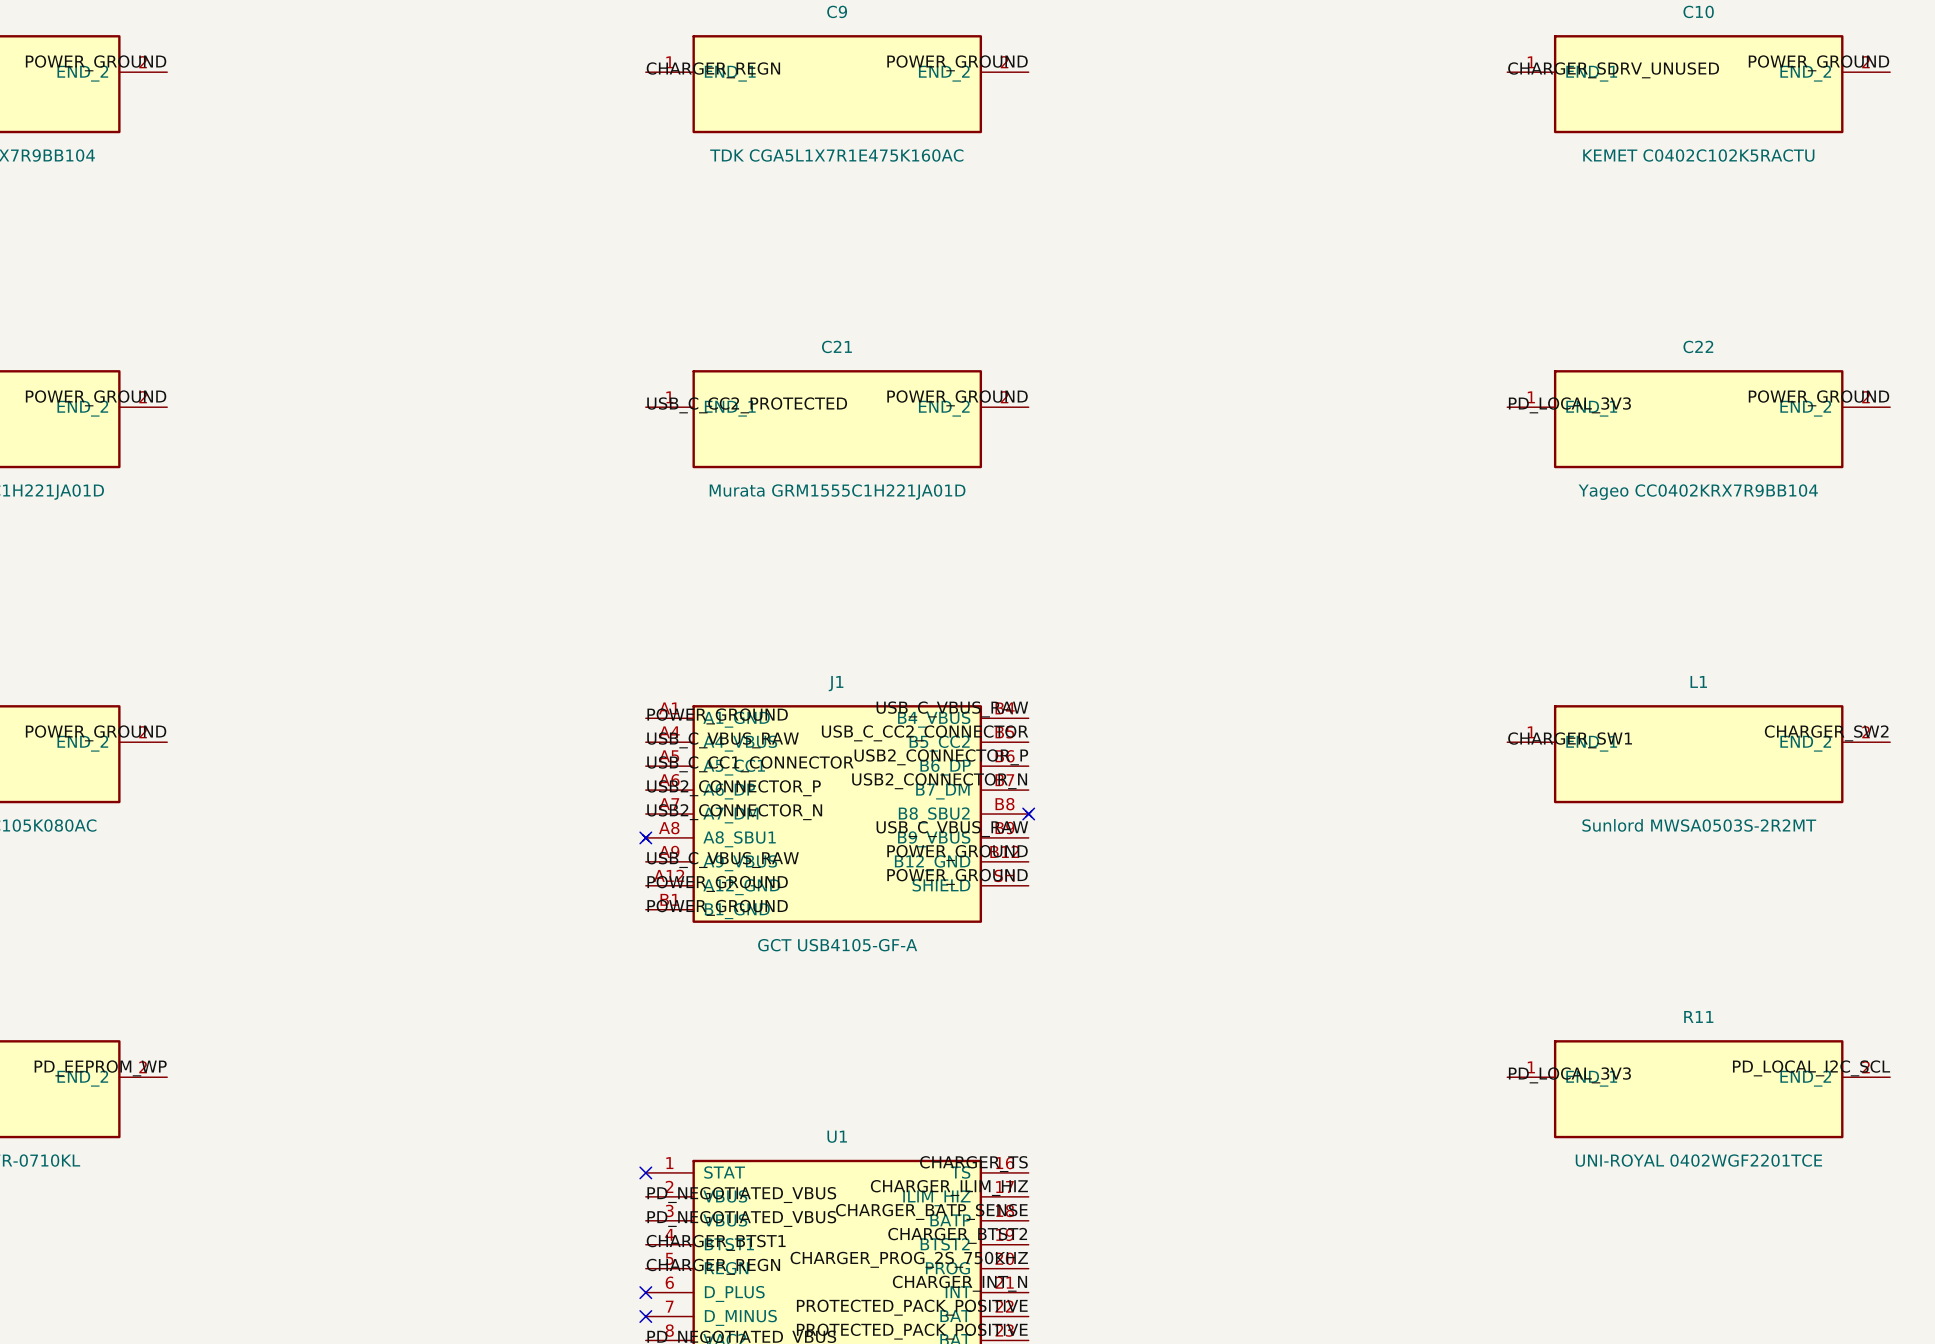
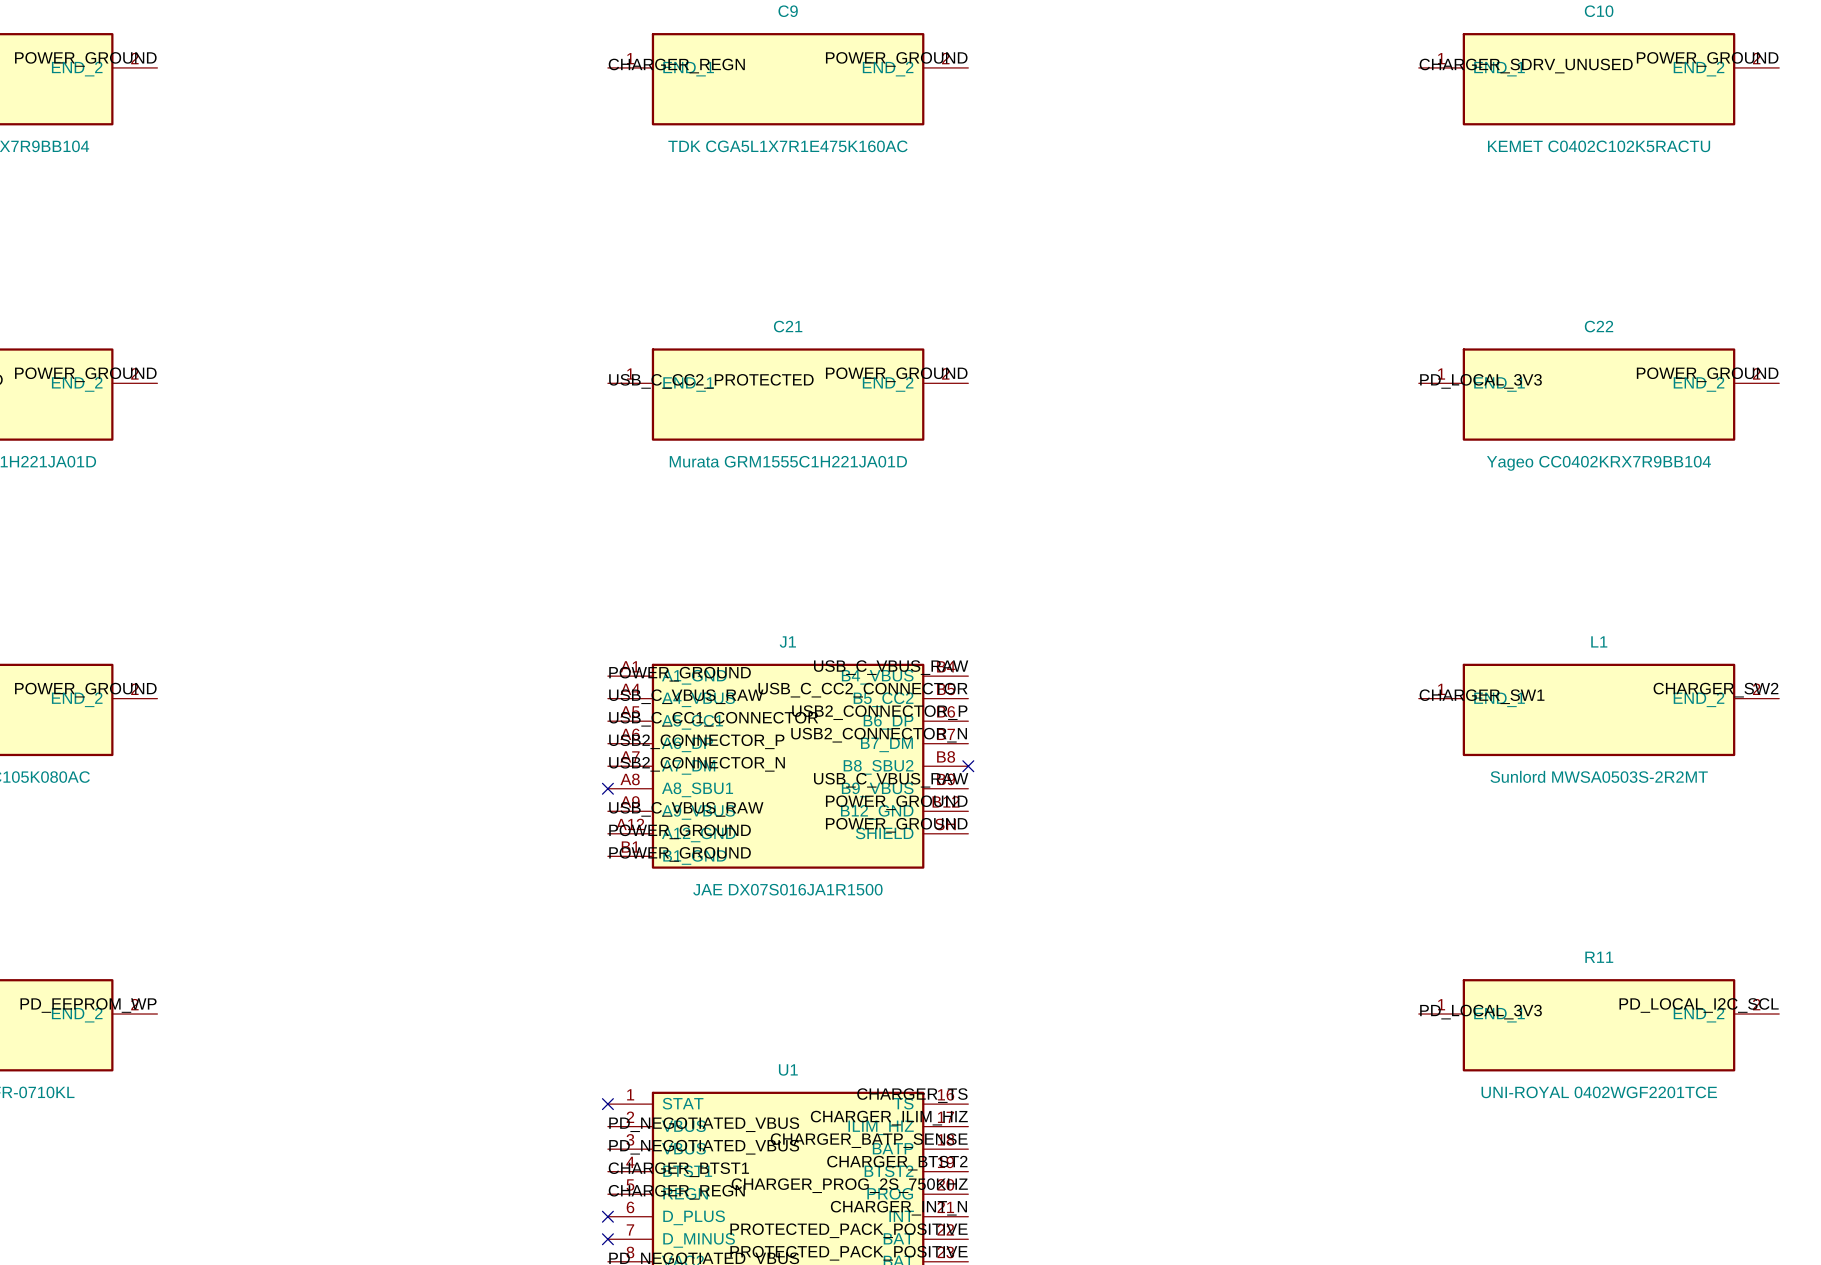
J1 symbol: [642, 705, 1032, 923] -> [607, 663, 969, 869]
J1 value: GCT USB4105-GF-A (837, 945) -> JAE DX07S016JA1R1500 (787, 889)

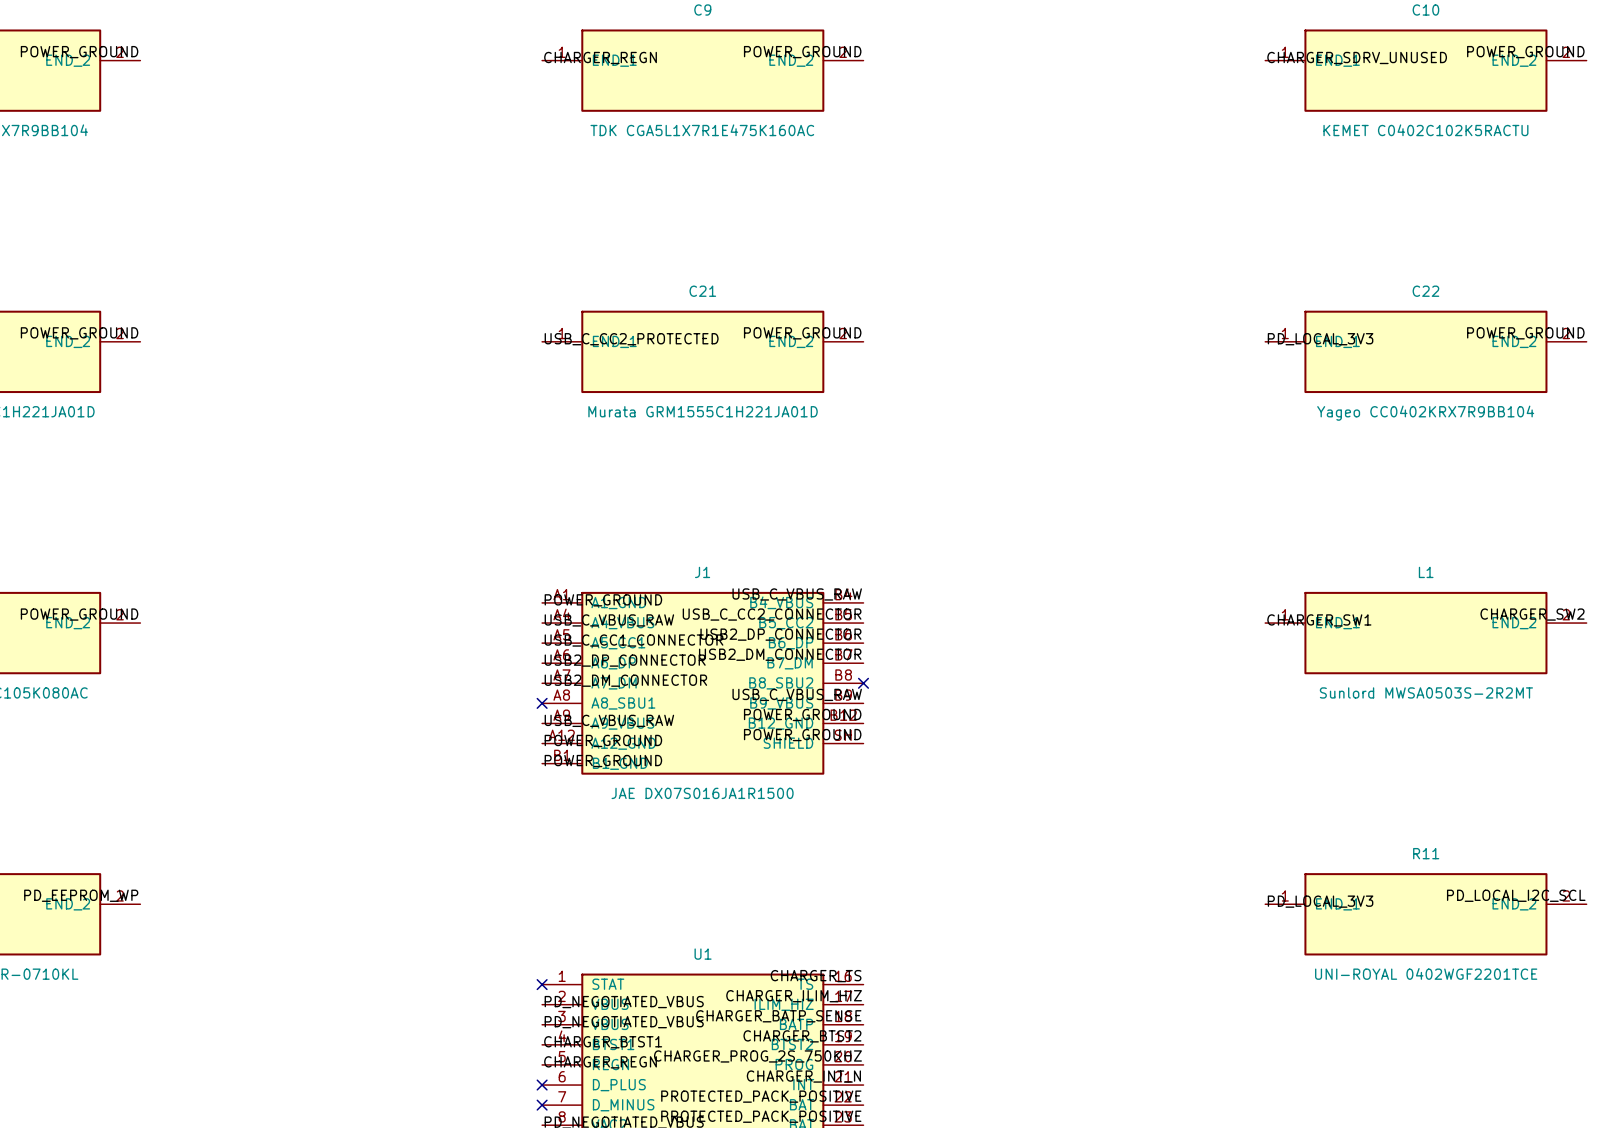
label: USB2_CONNECTOR_P (879, 712) -> USB2_DP_CONNECTOR (780, 634)
label: USB2_CONNECTOR_N (879, 735) -> USB2_DM_CONNECTOR (780, 654)
label: USB2_CONNECTOR_P (696, 741) -> USB2_DP_CONNECTOR (625, 660)
label: USB2_CONNECTOR_N (697, 764) -> USB2_DM_CONNECTOR (625, 680)

